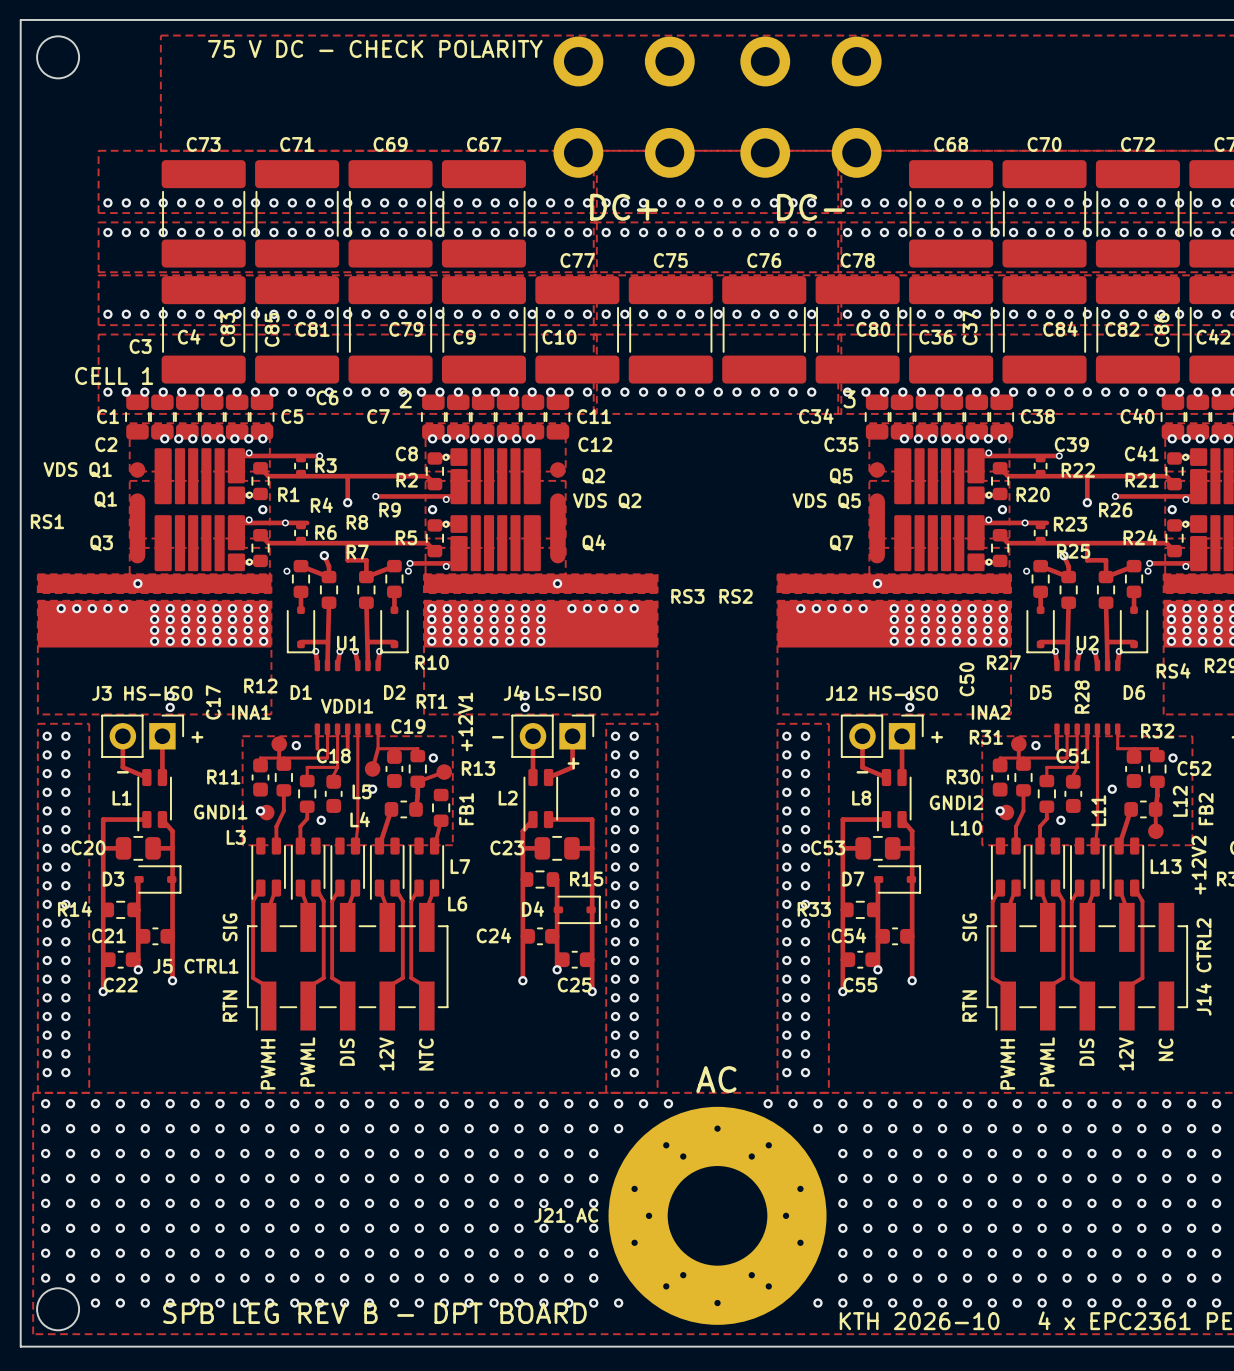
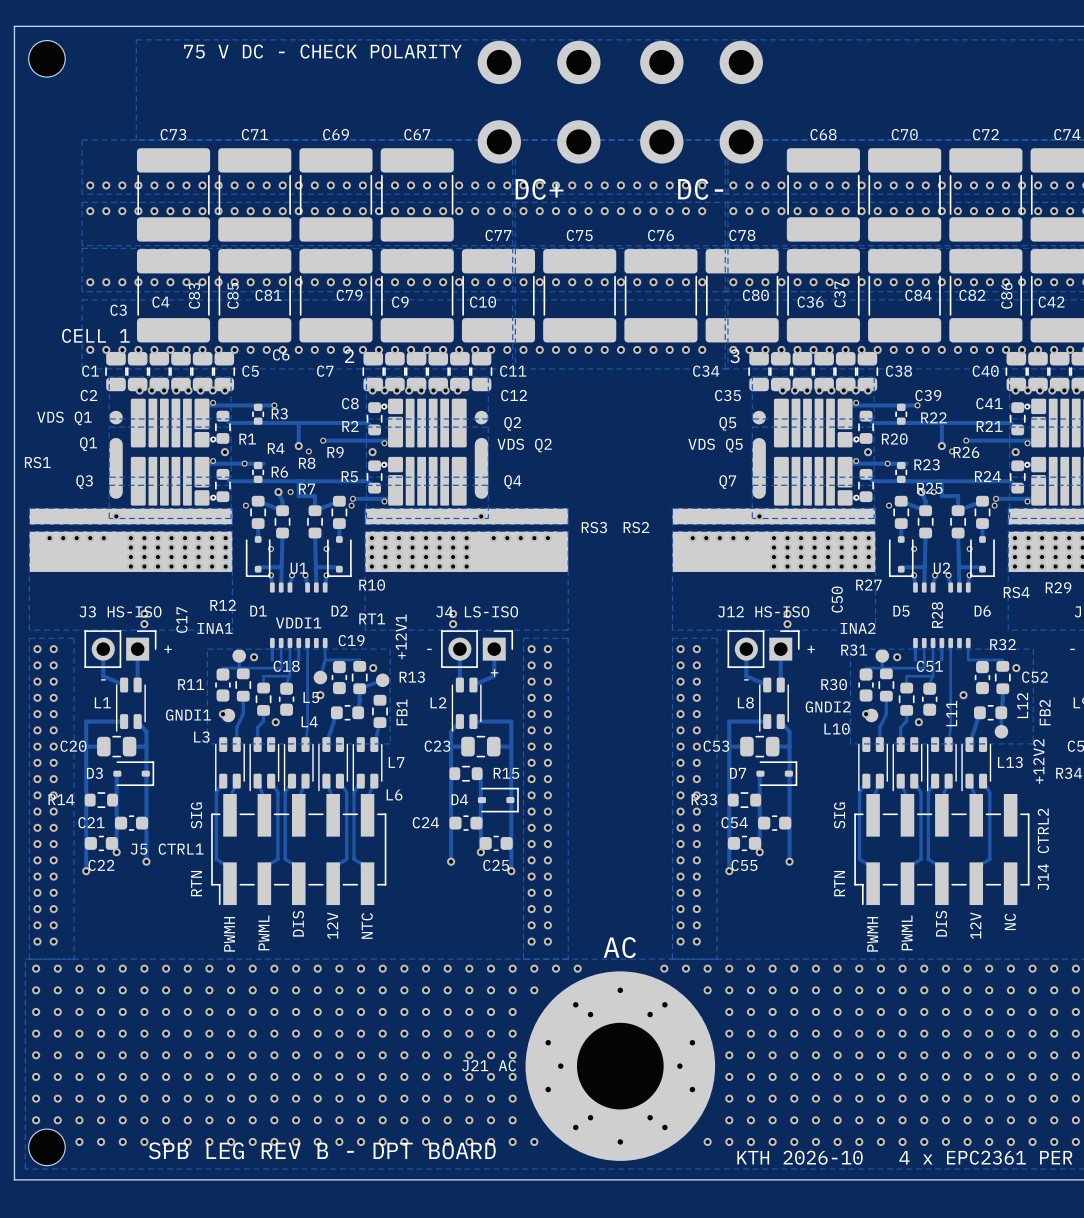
via: none -> (308, 451)
via: none -> (952, 451)
via: none -> (290, 492)
via: none -> (933, 492)
via: none -> (271, 548)
via: none -> (326, 548)
via: none -> (914, 548)
via: none -> (969, 548)

